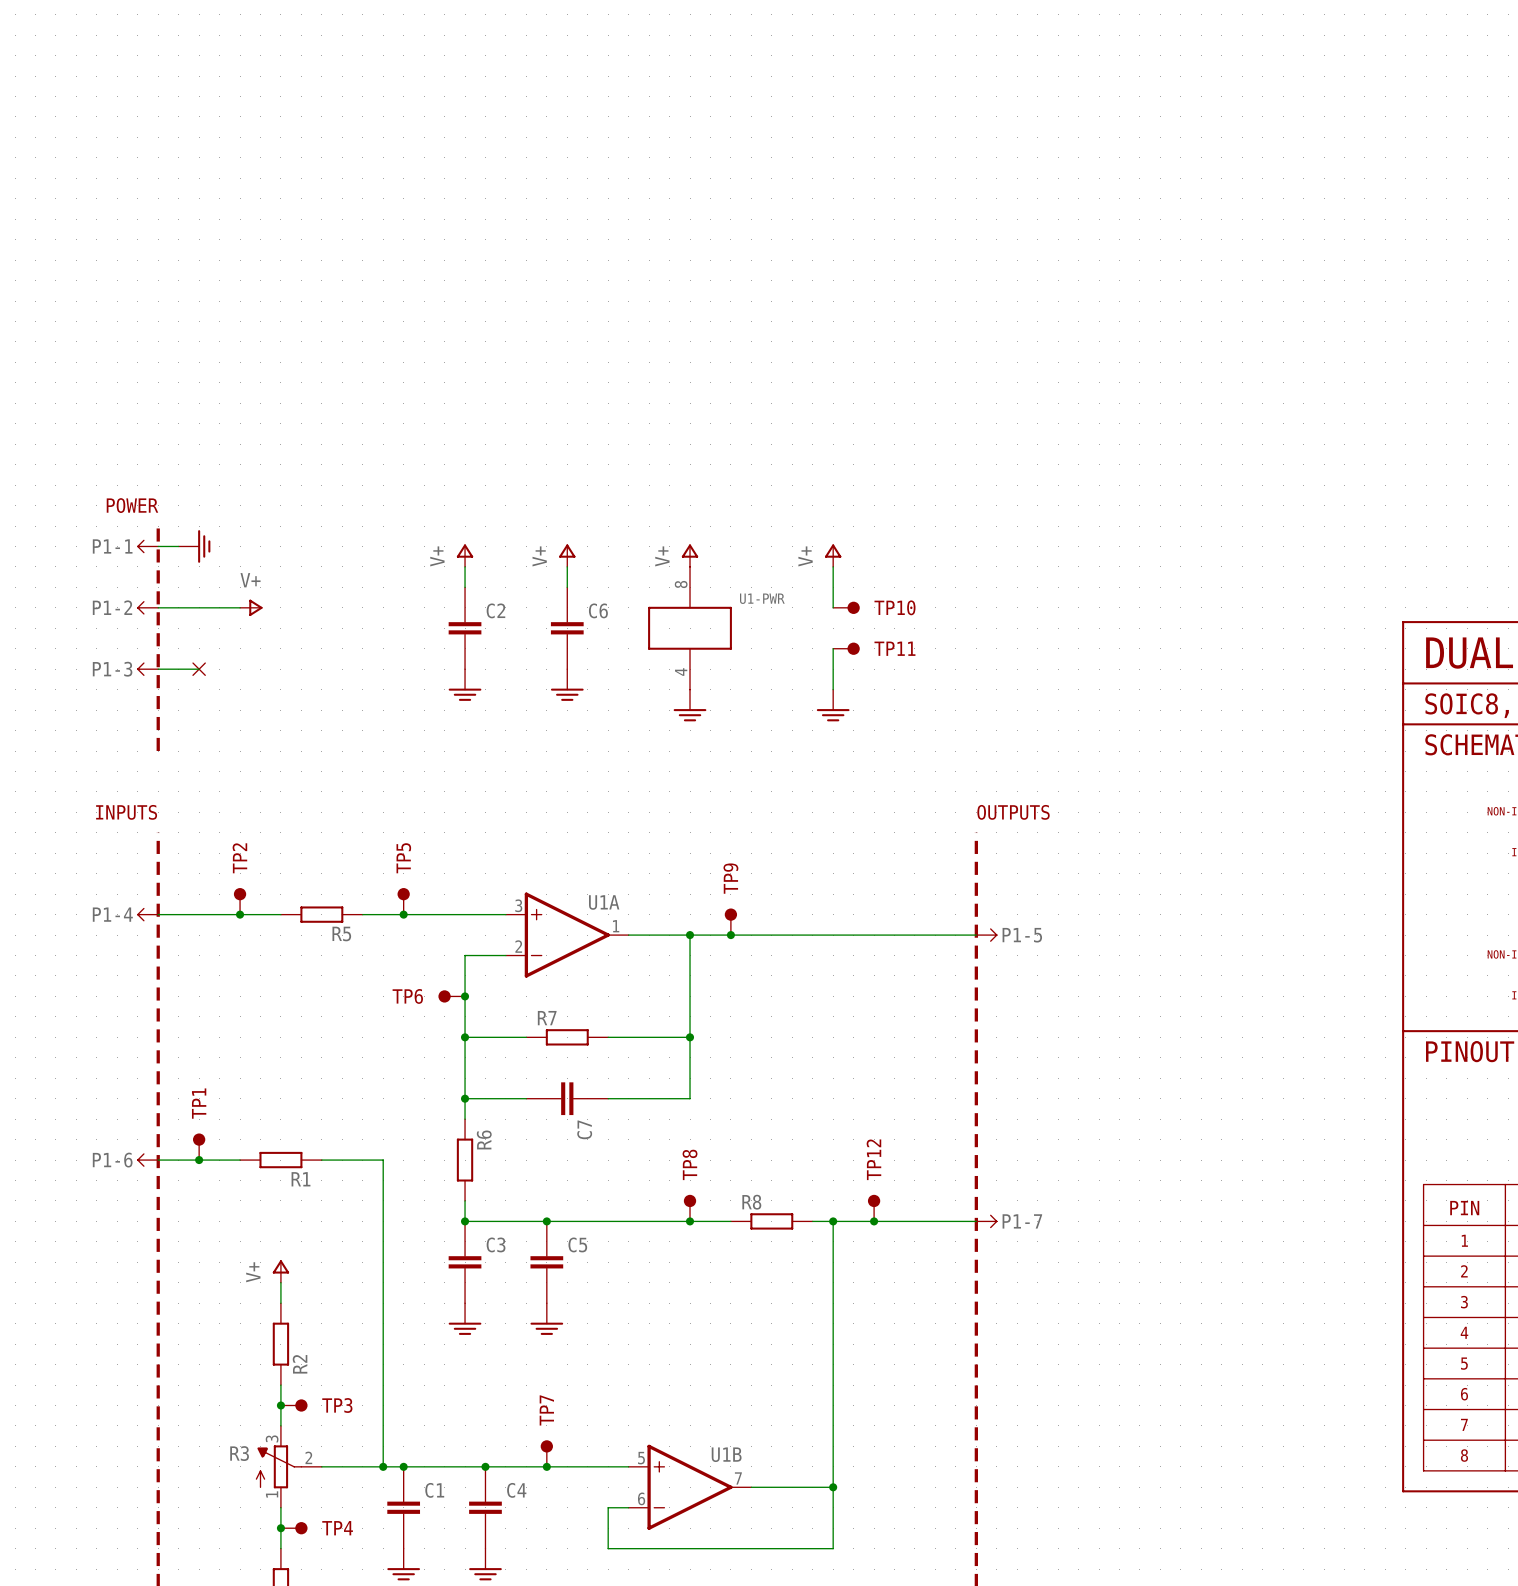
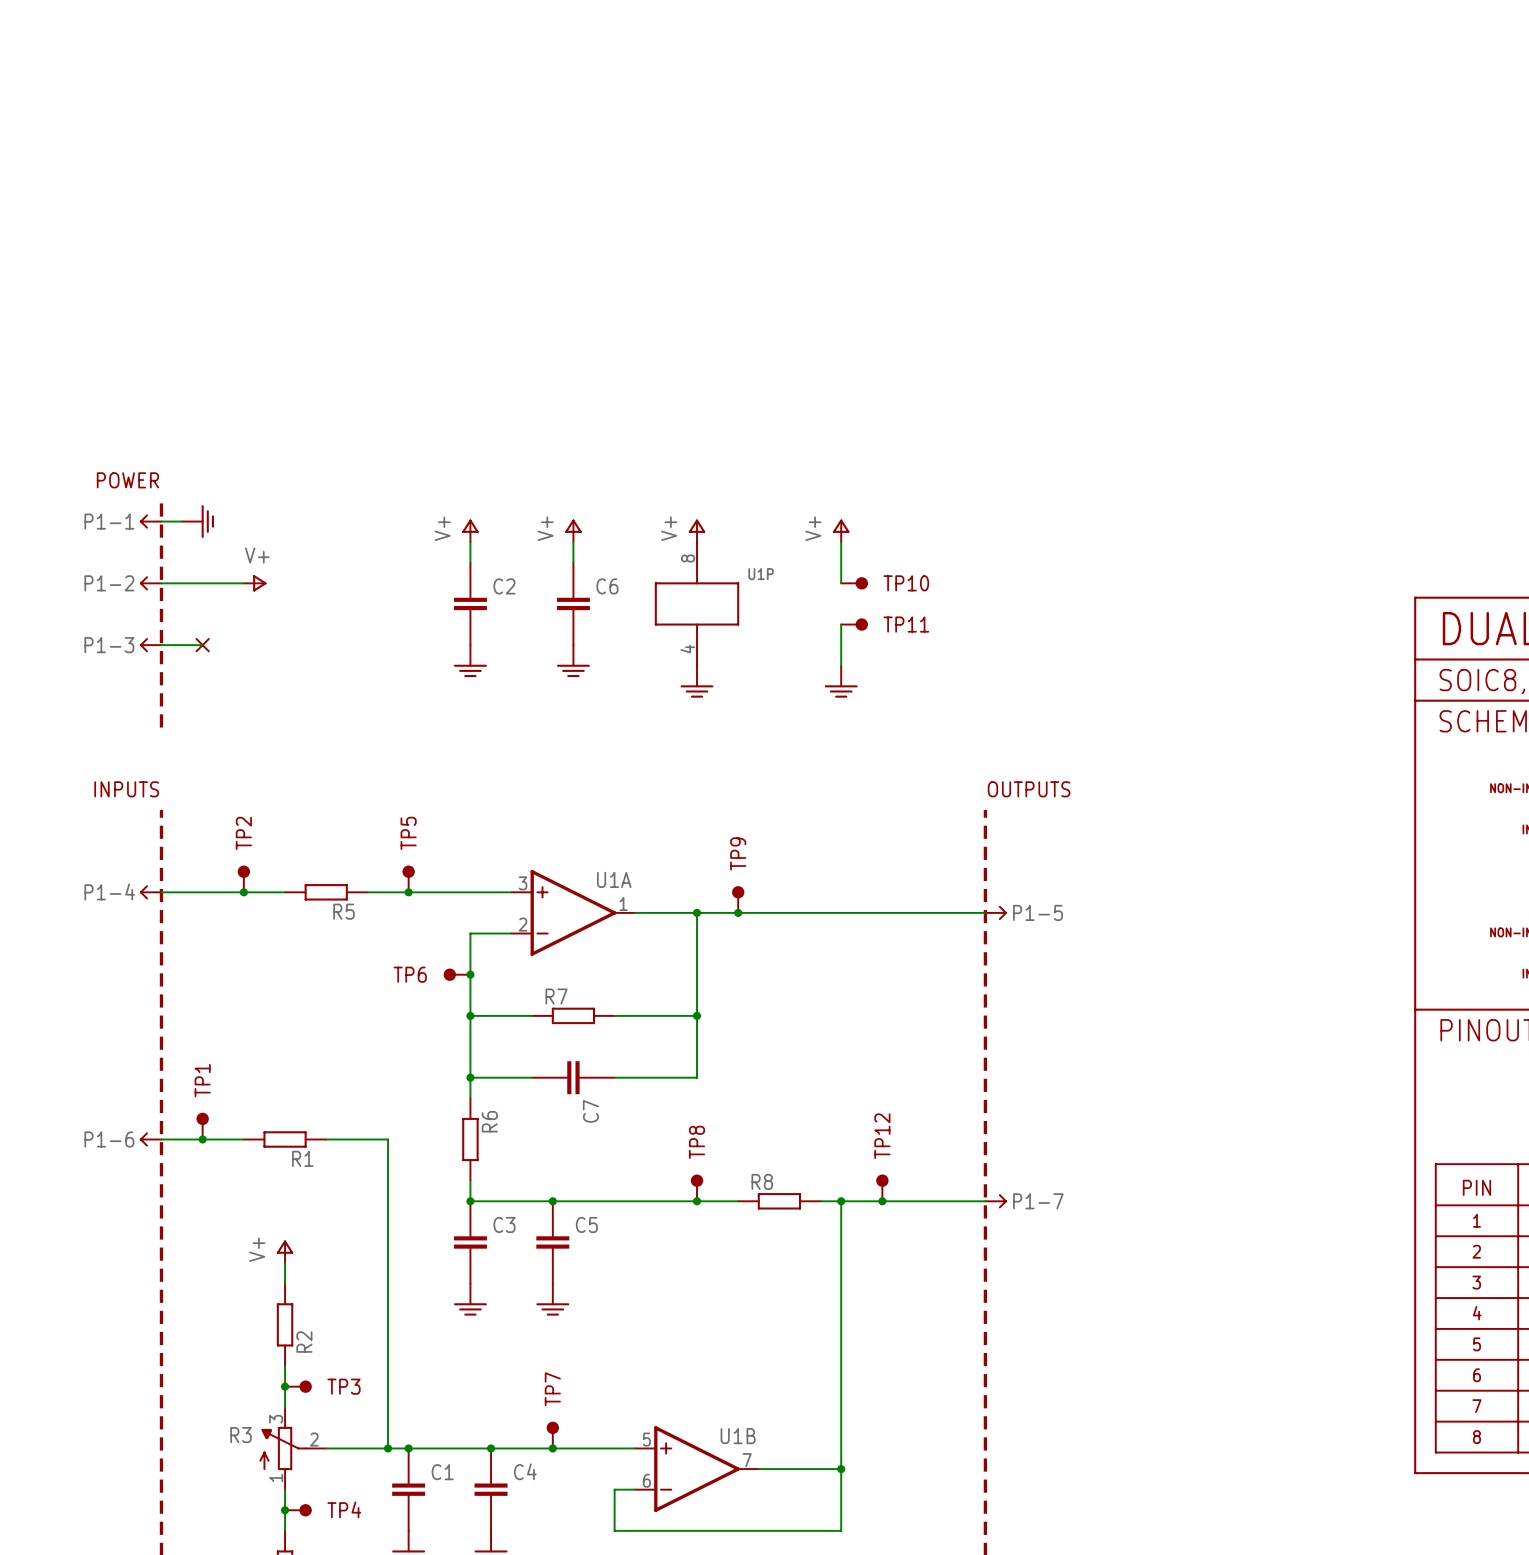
U1-PWR name: U1-PWR (762, 598) -> U1P (761, 574)

